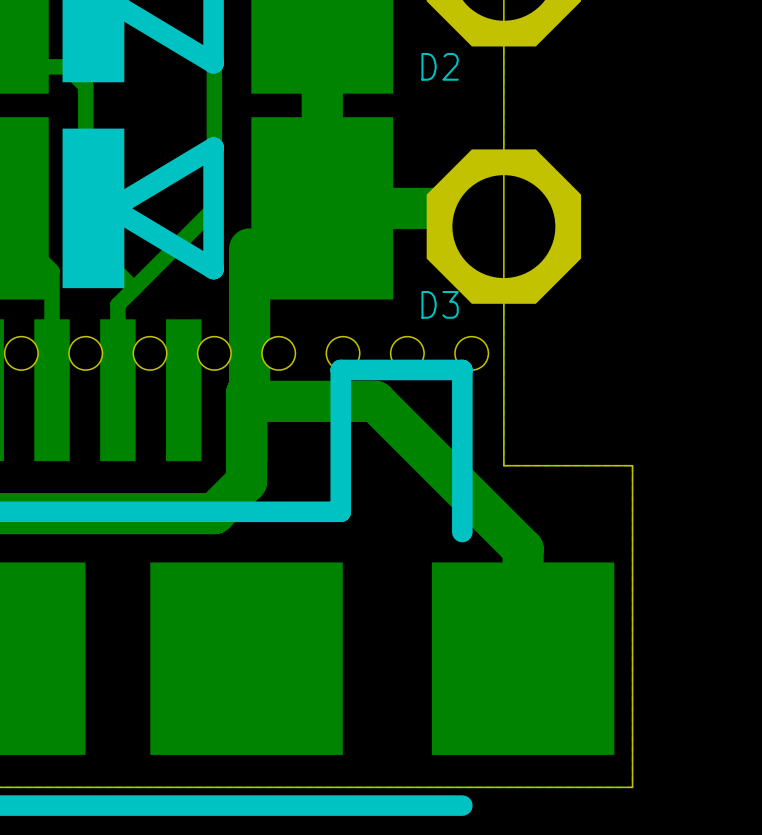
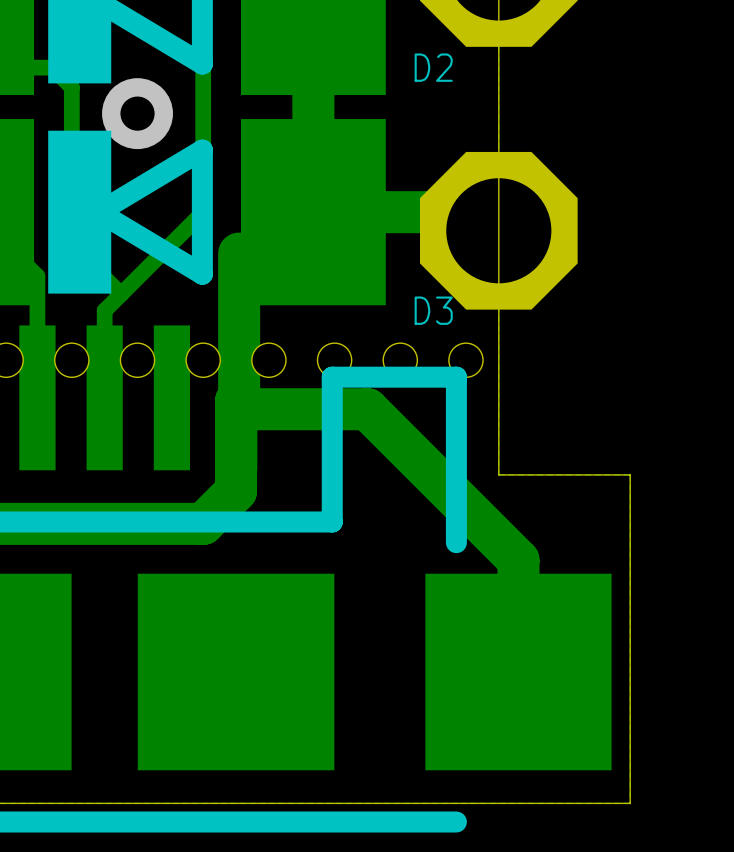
via: none -> (137, 113)

